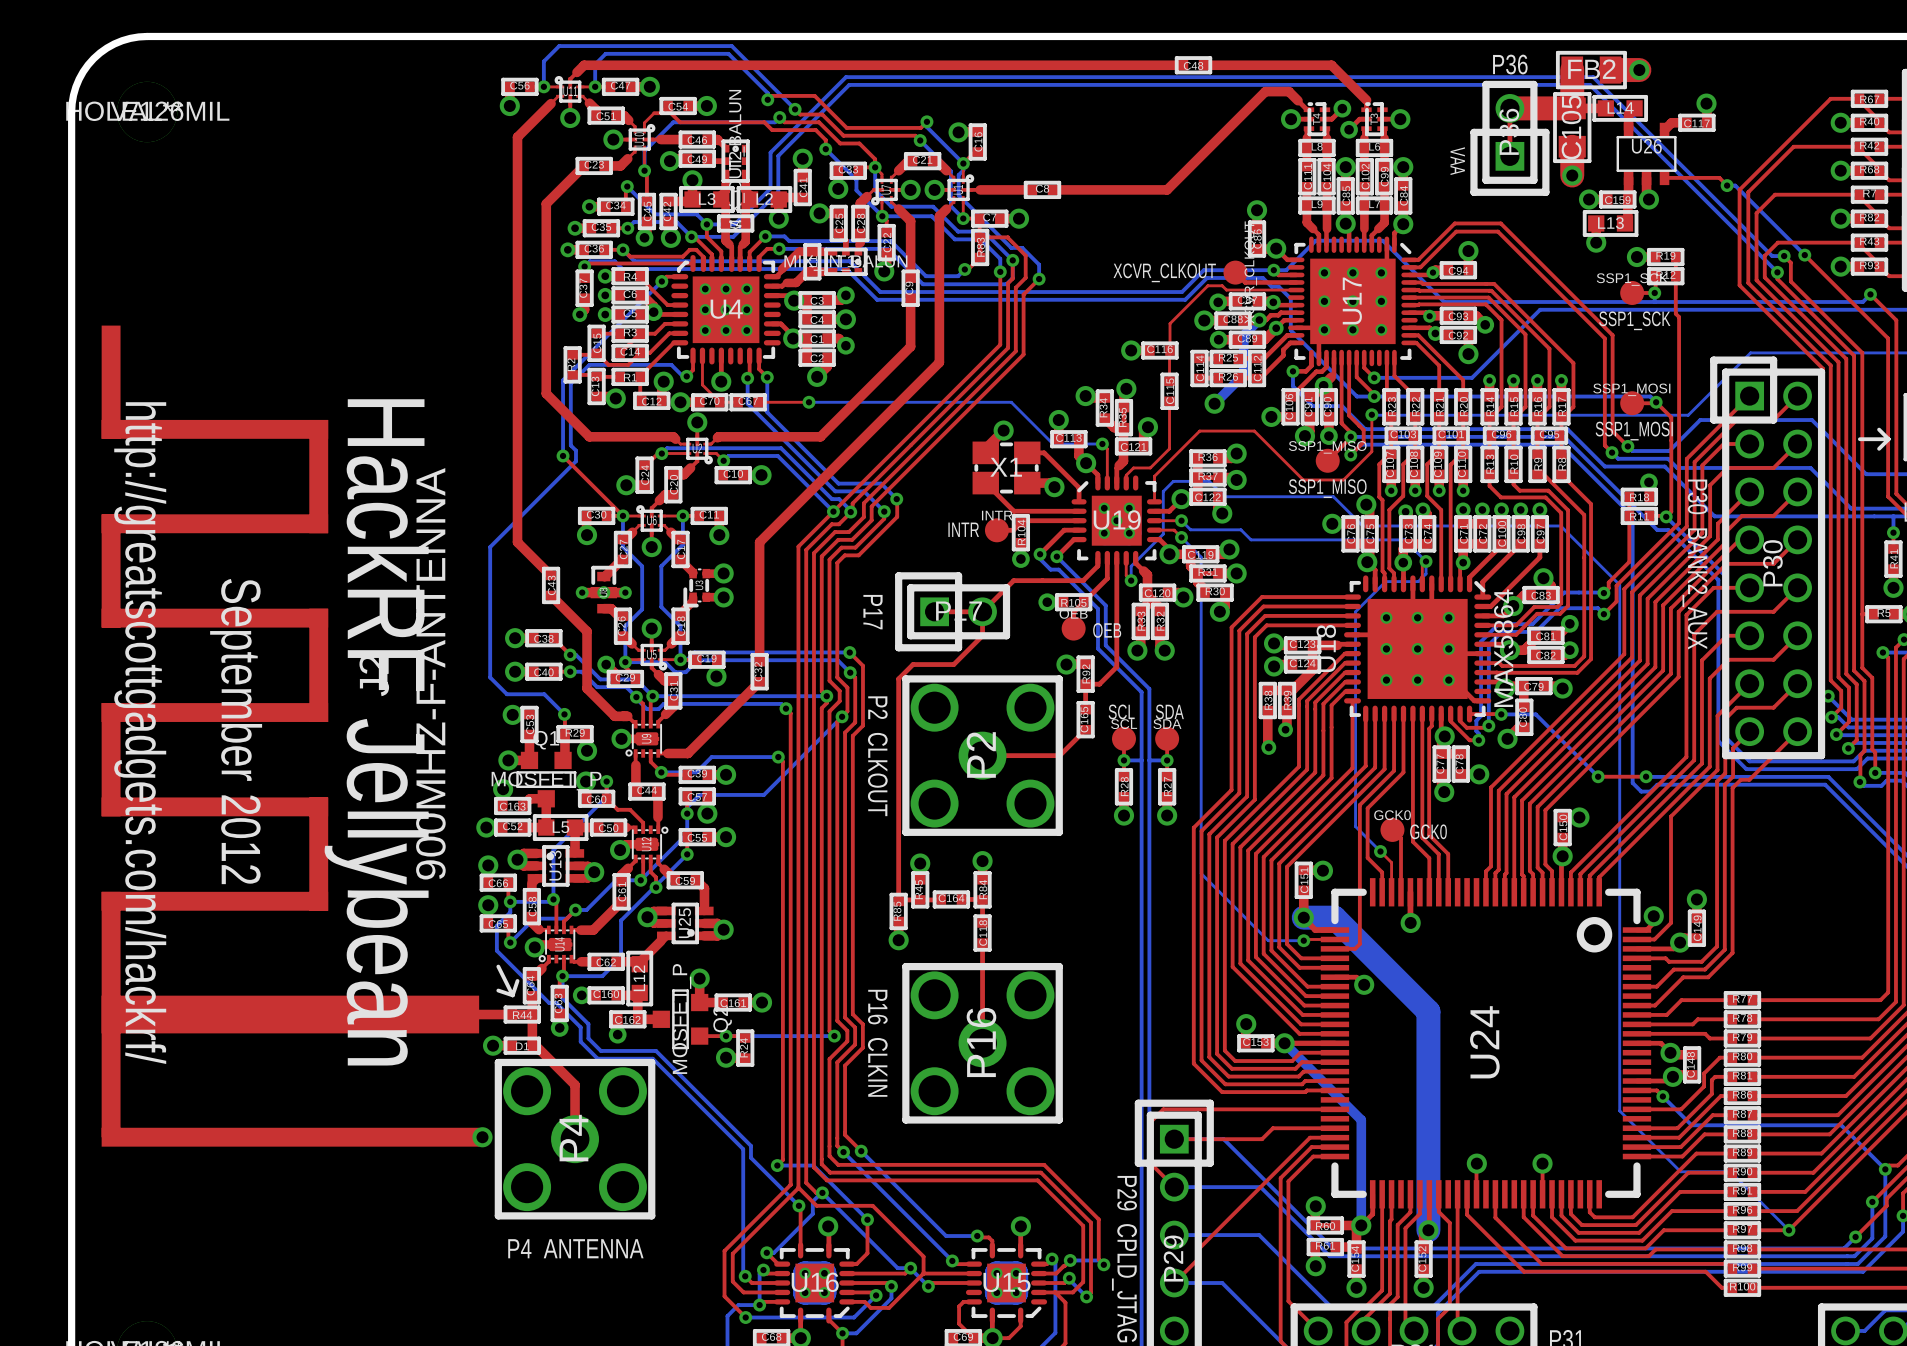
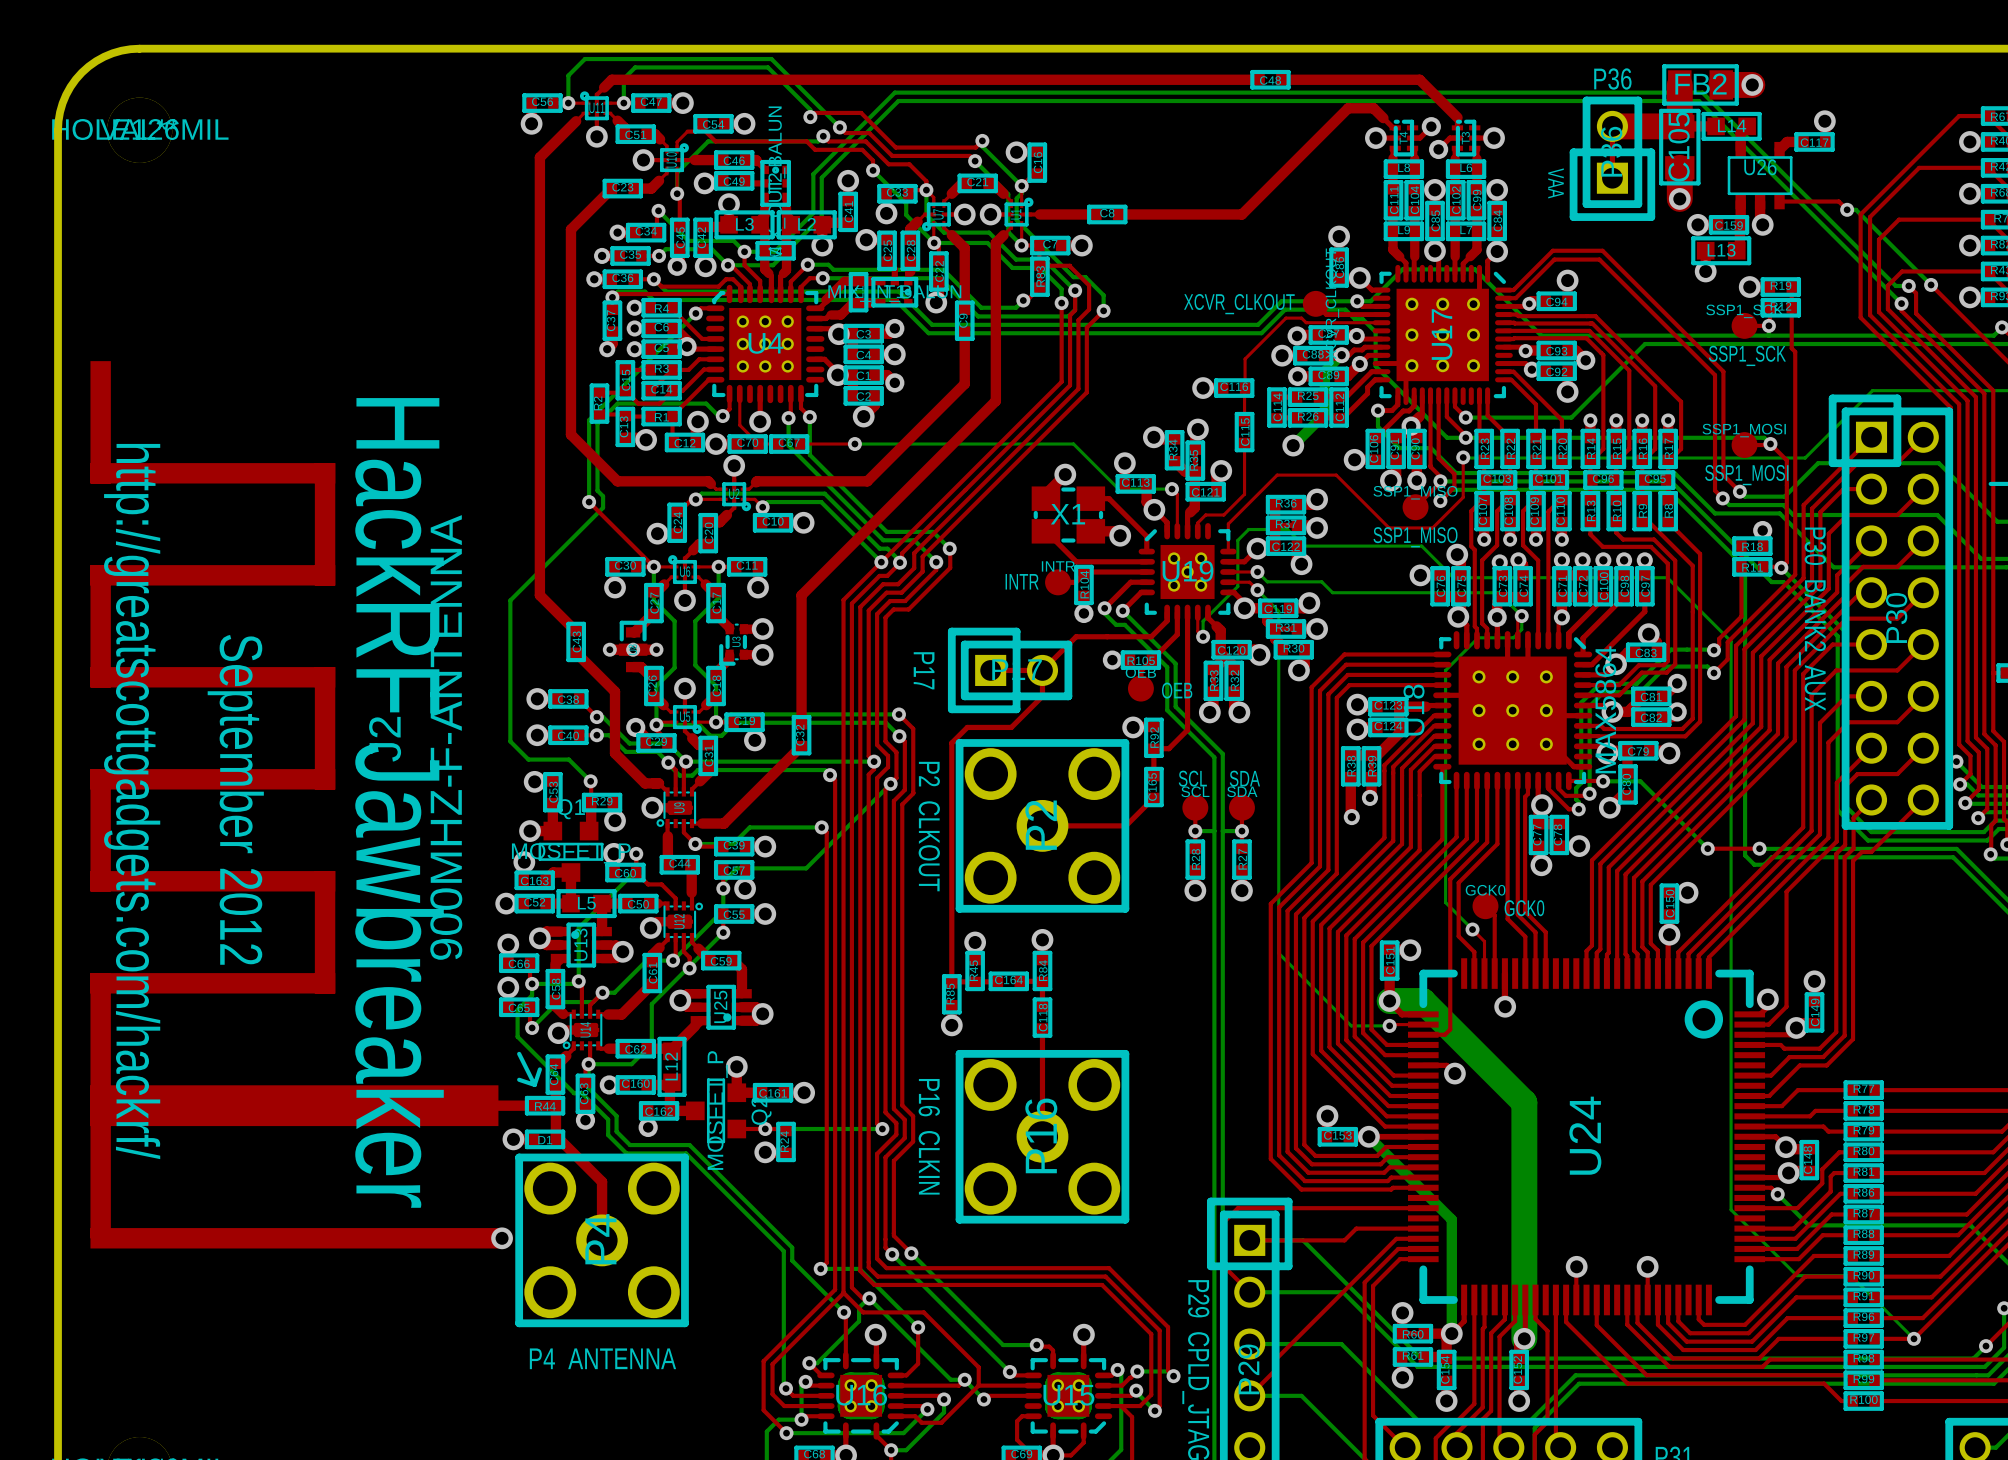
text: HackRF Jellybean (376, 732) -> HackRF Jawbreaker (399, 802)

